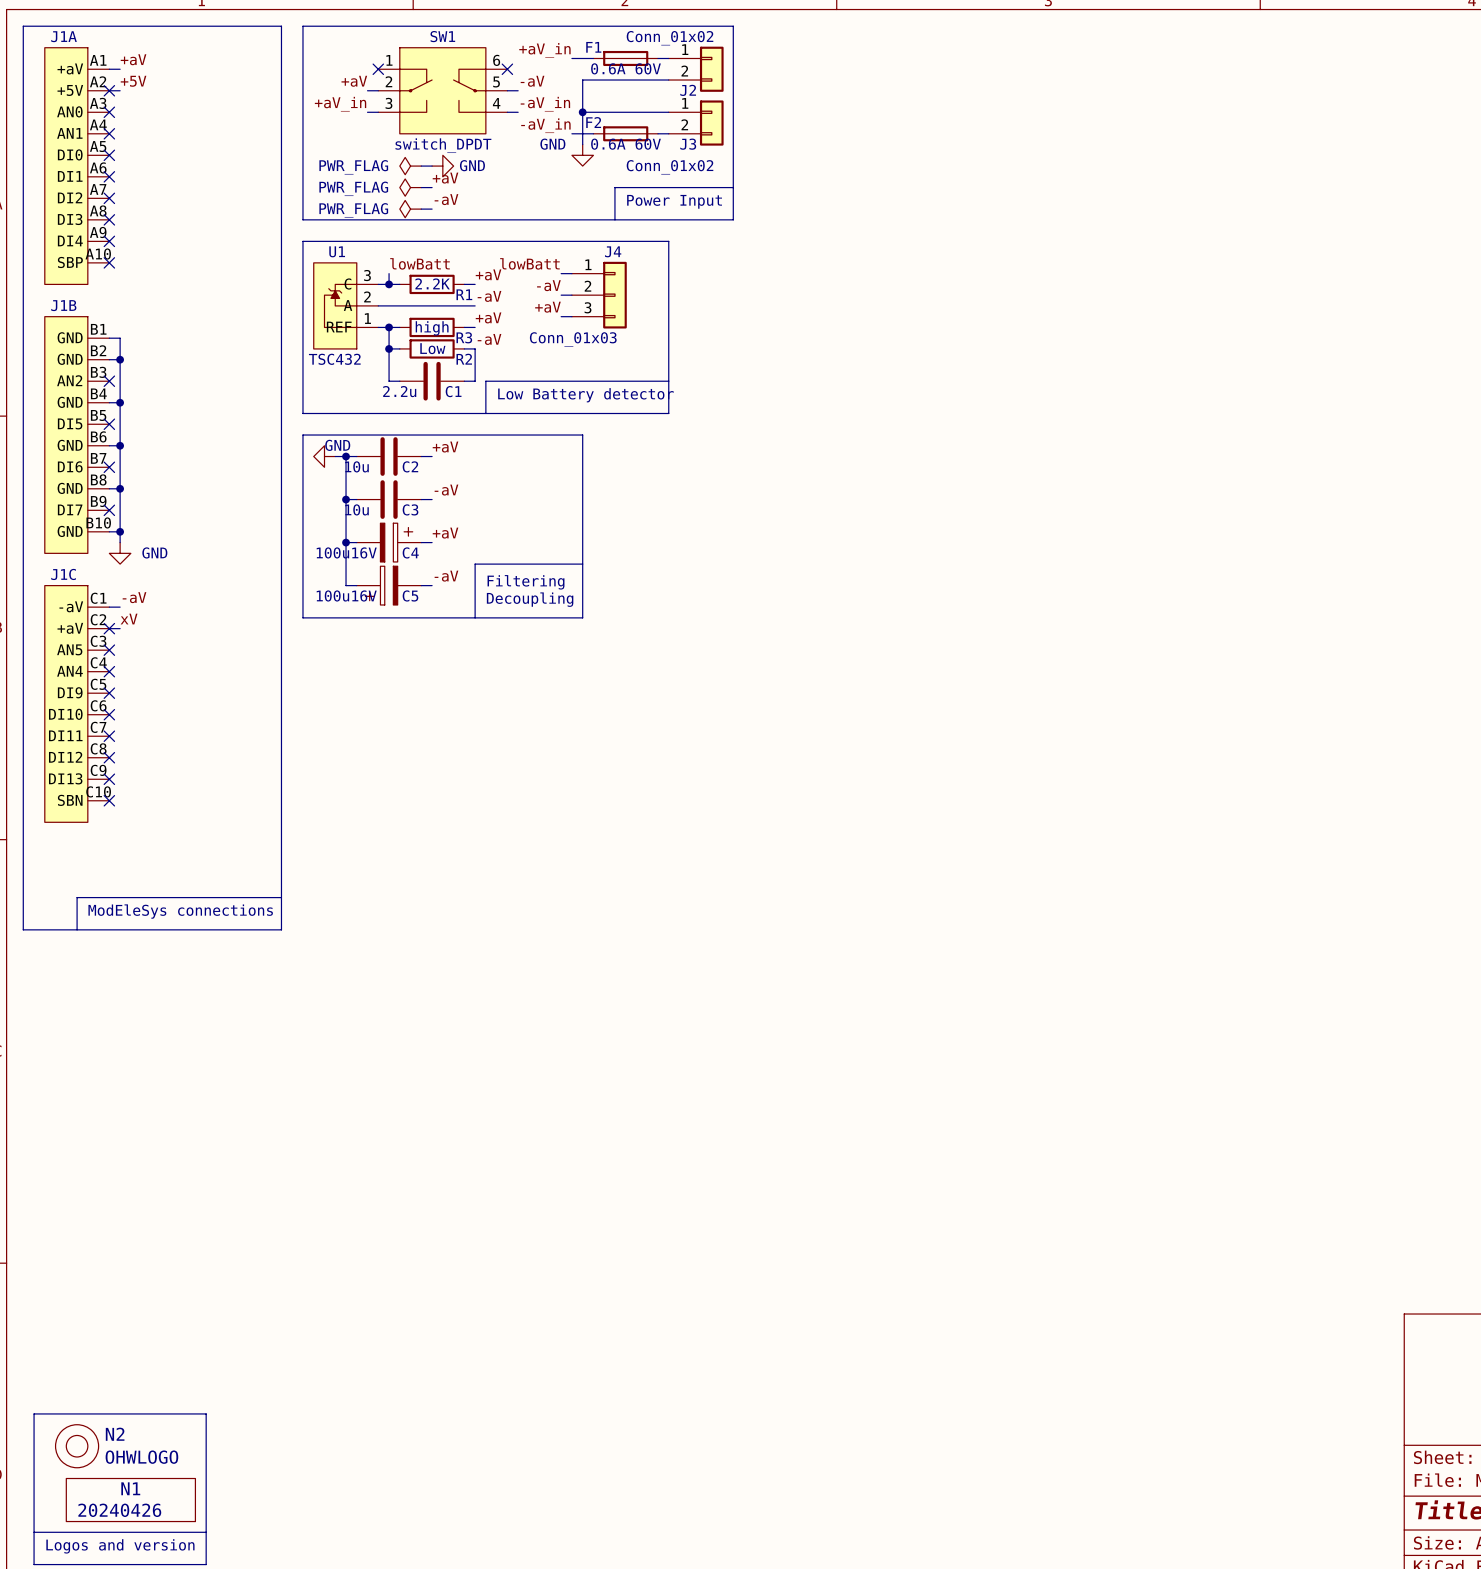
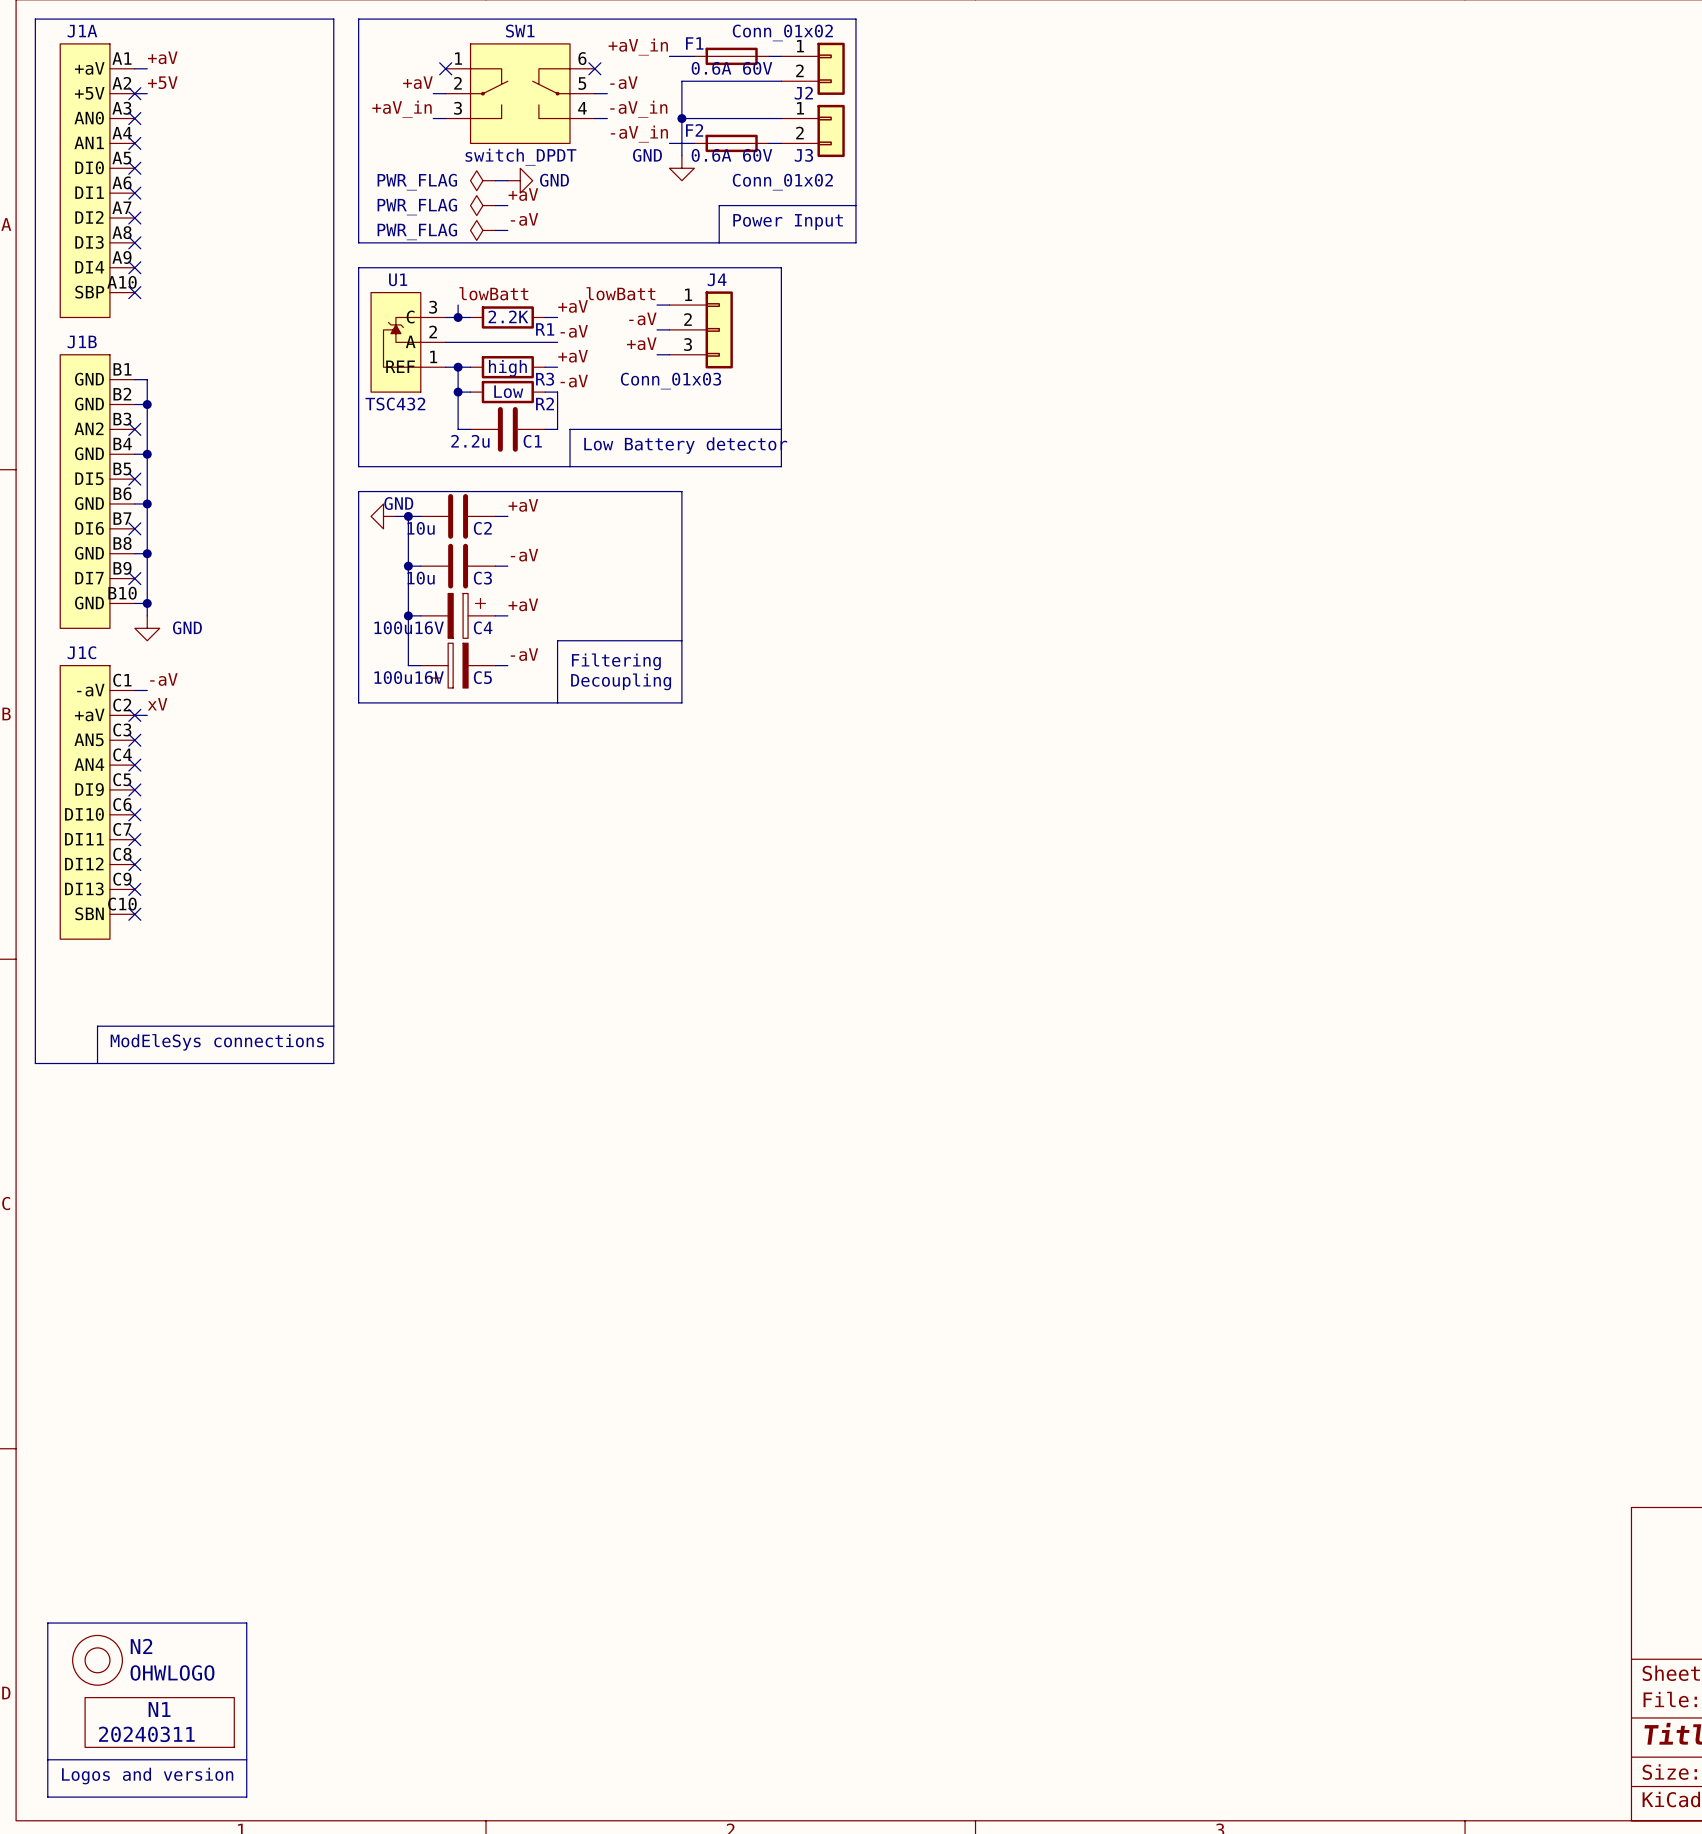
N1 value: 20240426 (119, 1510) -> 20240311 (146, 1734)

